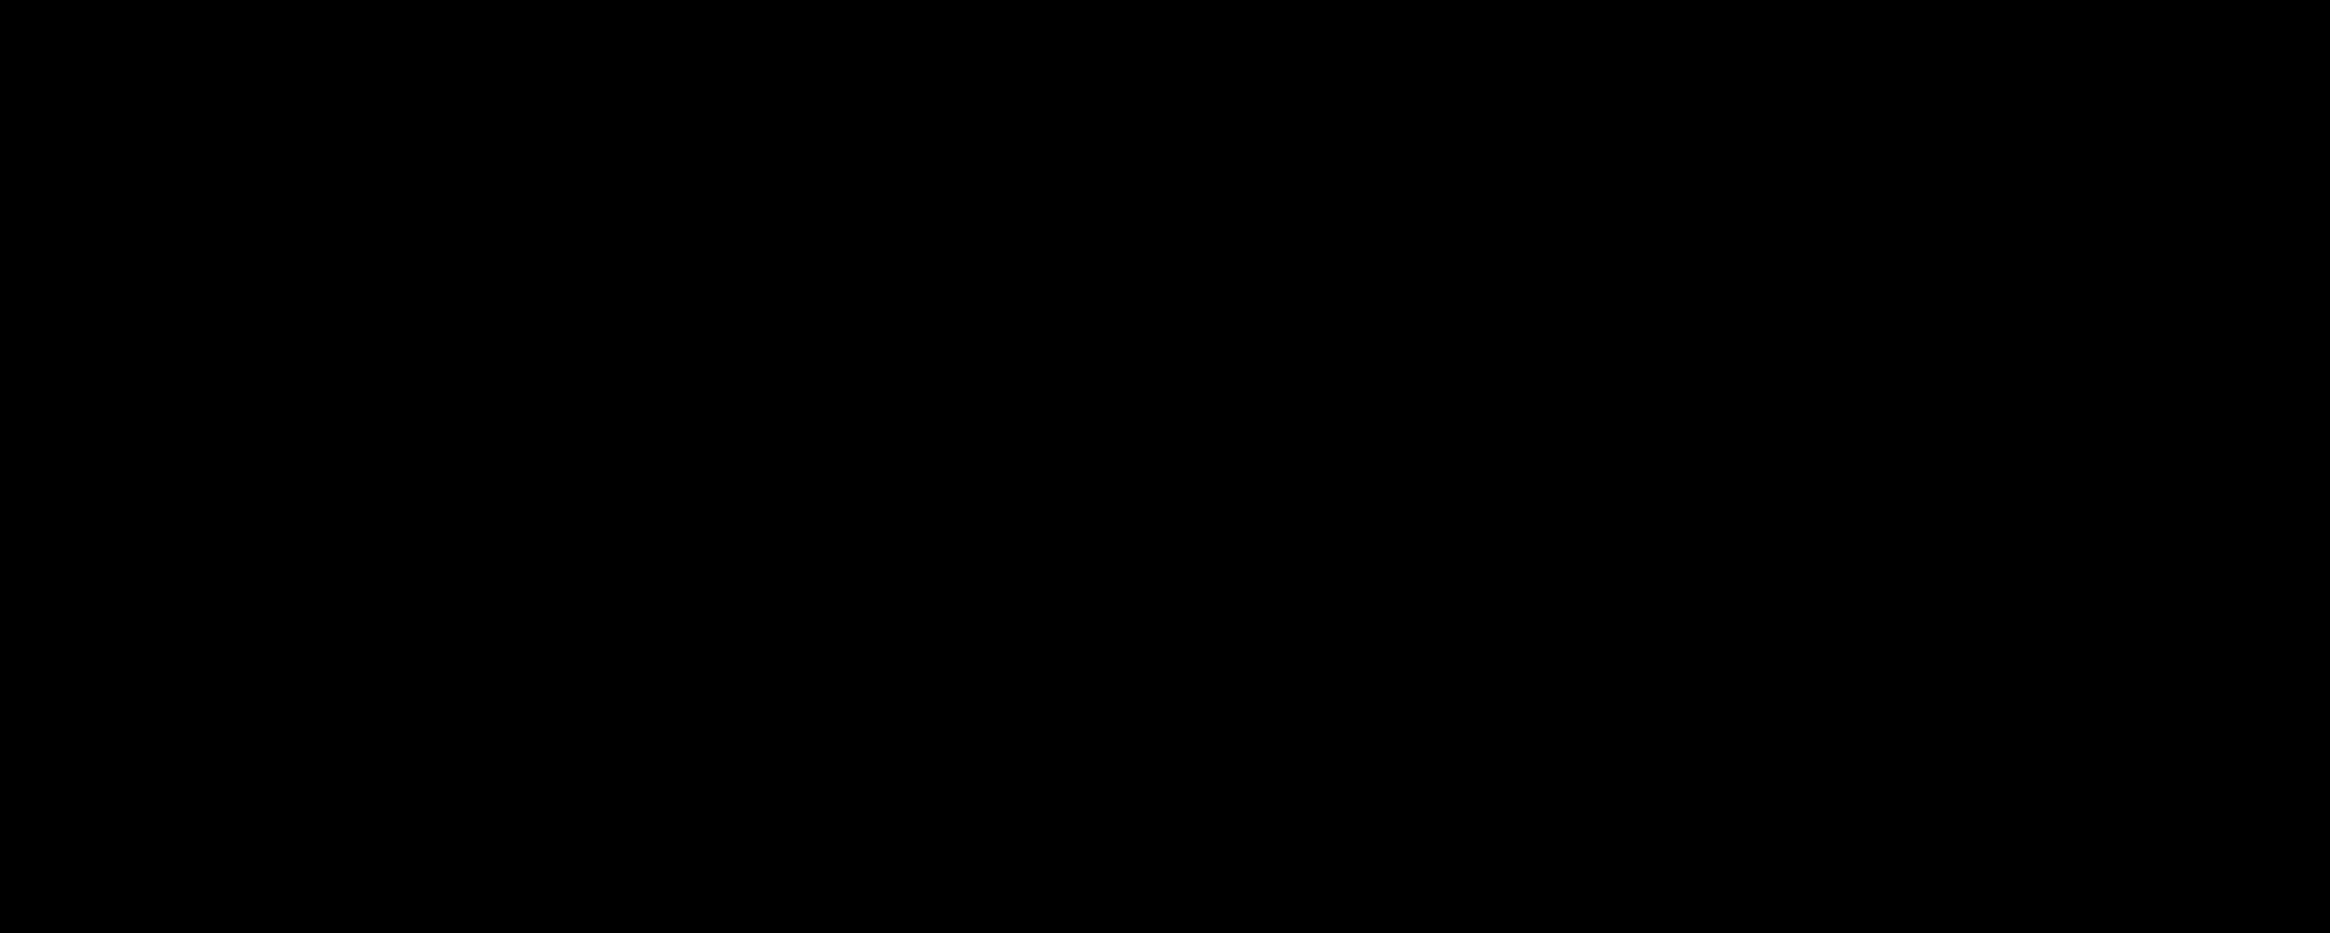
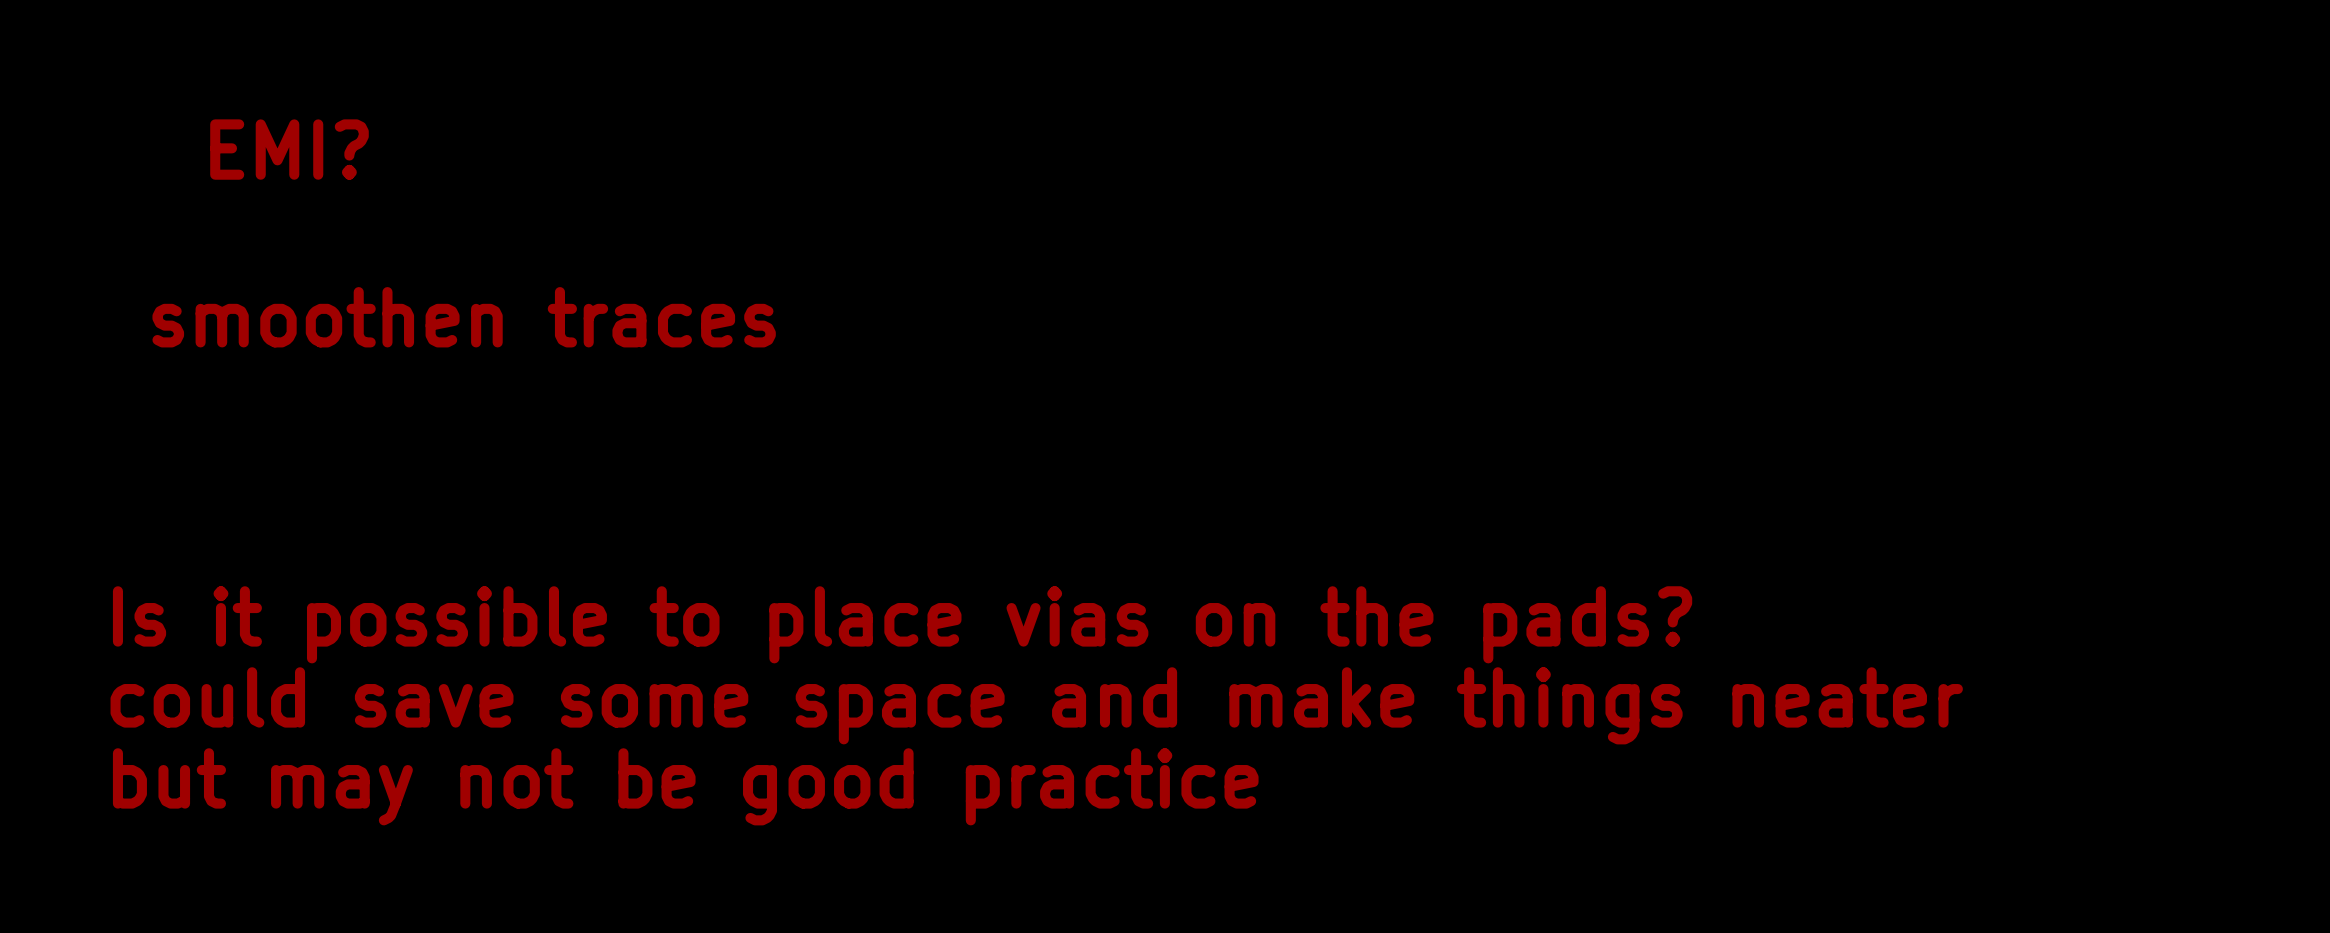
text: none -> EMI? (289, 149)
text: none -> smoothen traces (464, 317)
text: none -> Is it possible to place vias on the pads? (902, 624)
text: none -> could save some space and make things neater (1036, 705)
text: none -> but may not be good practice (685, 786)

